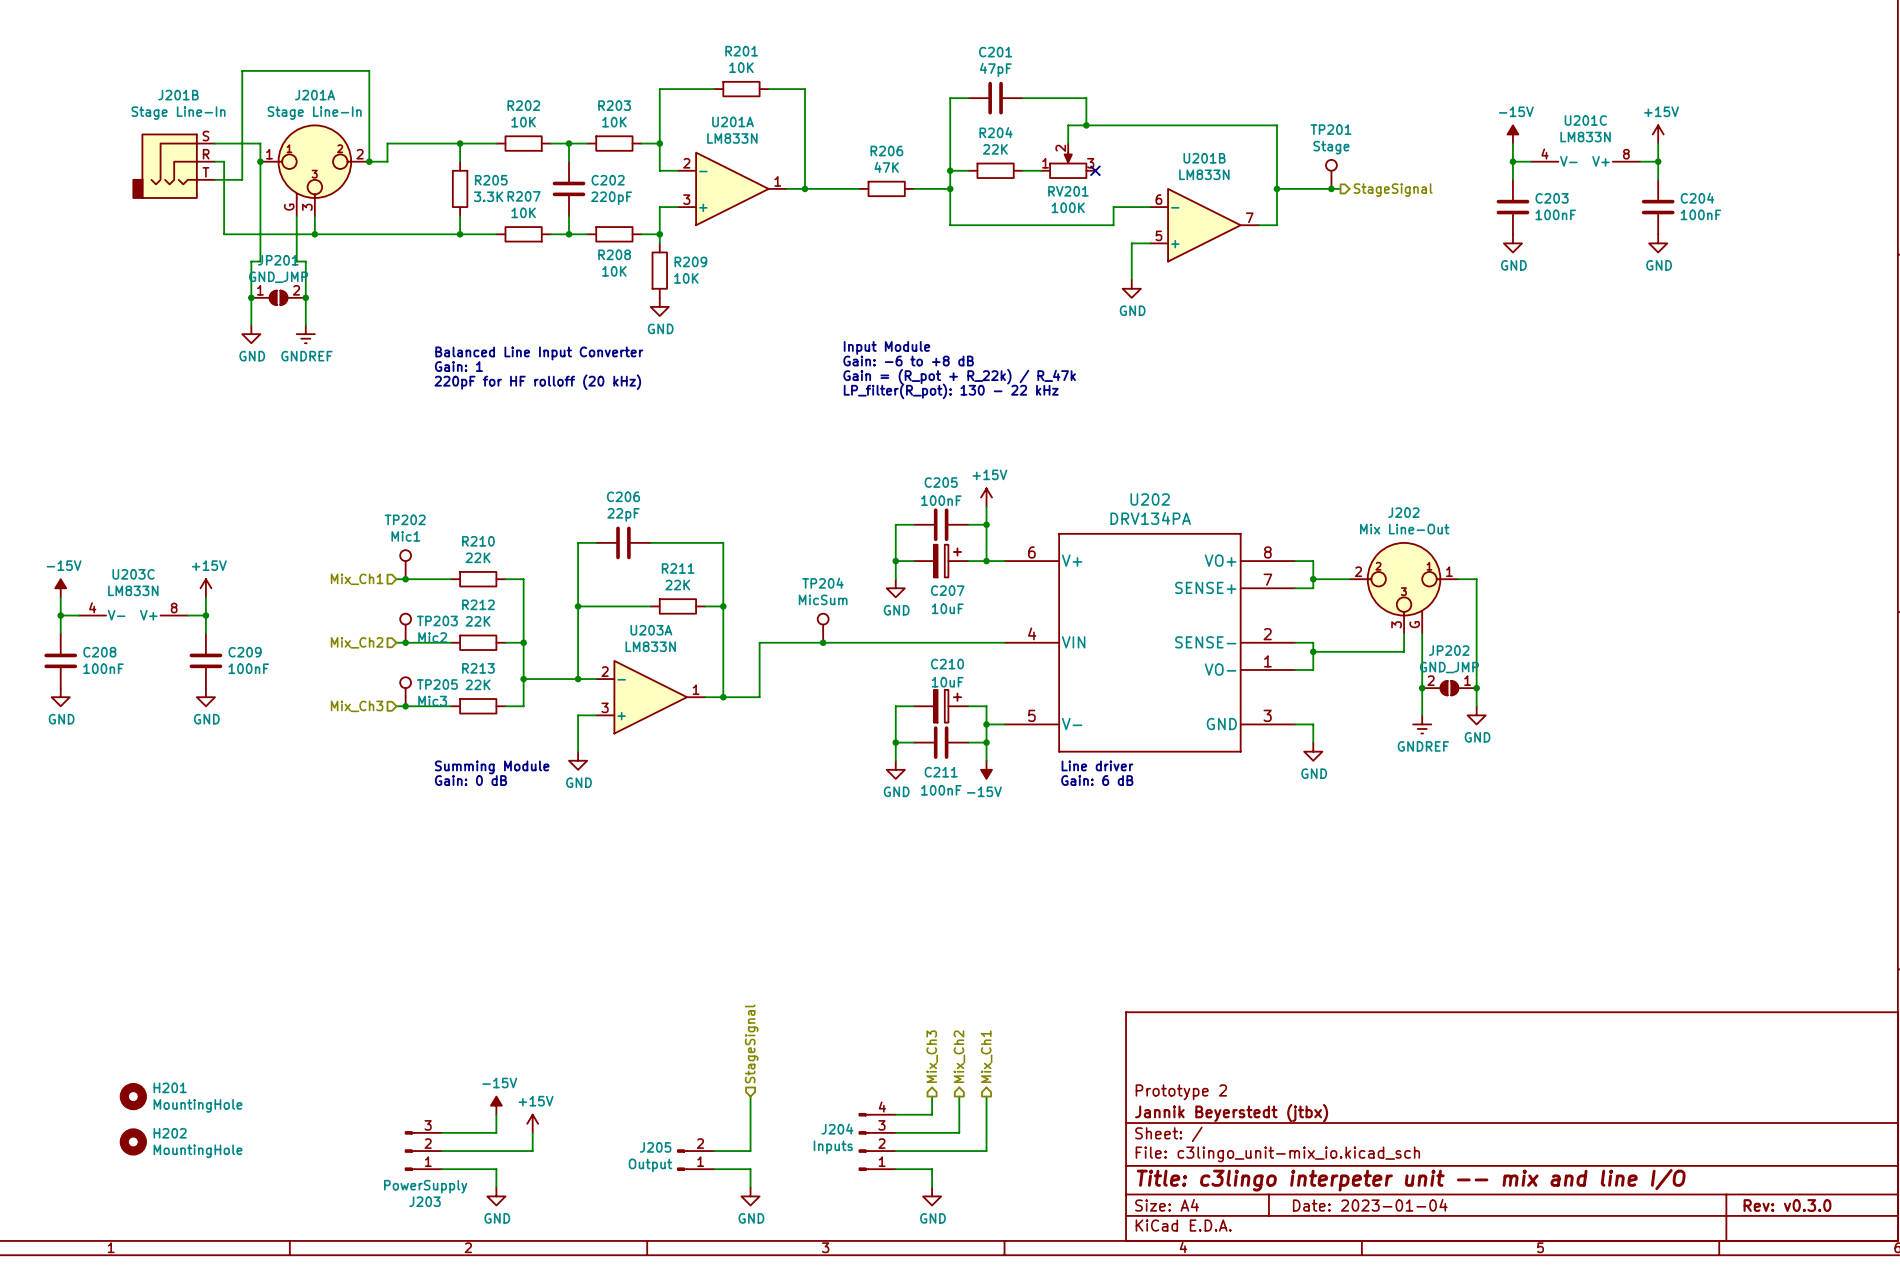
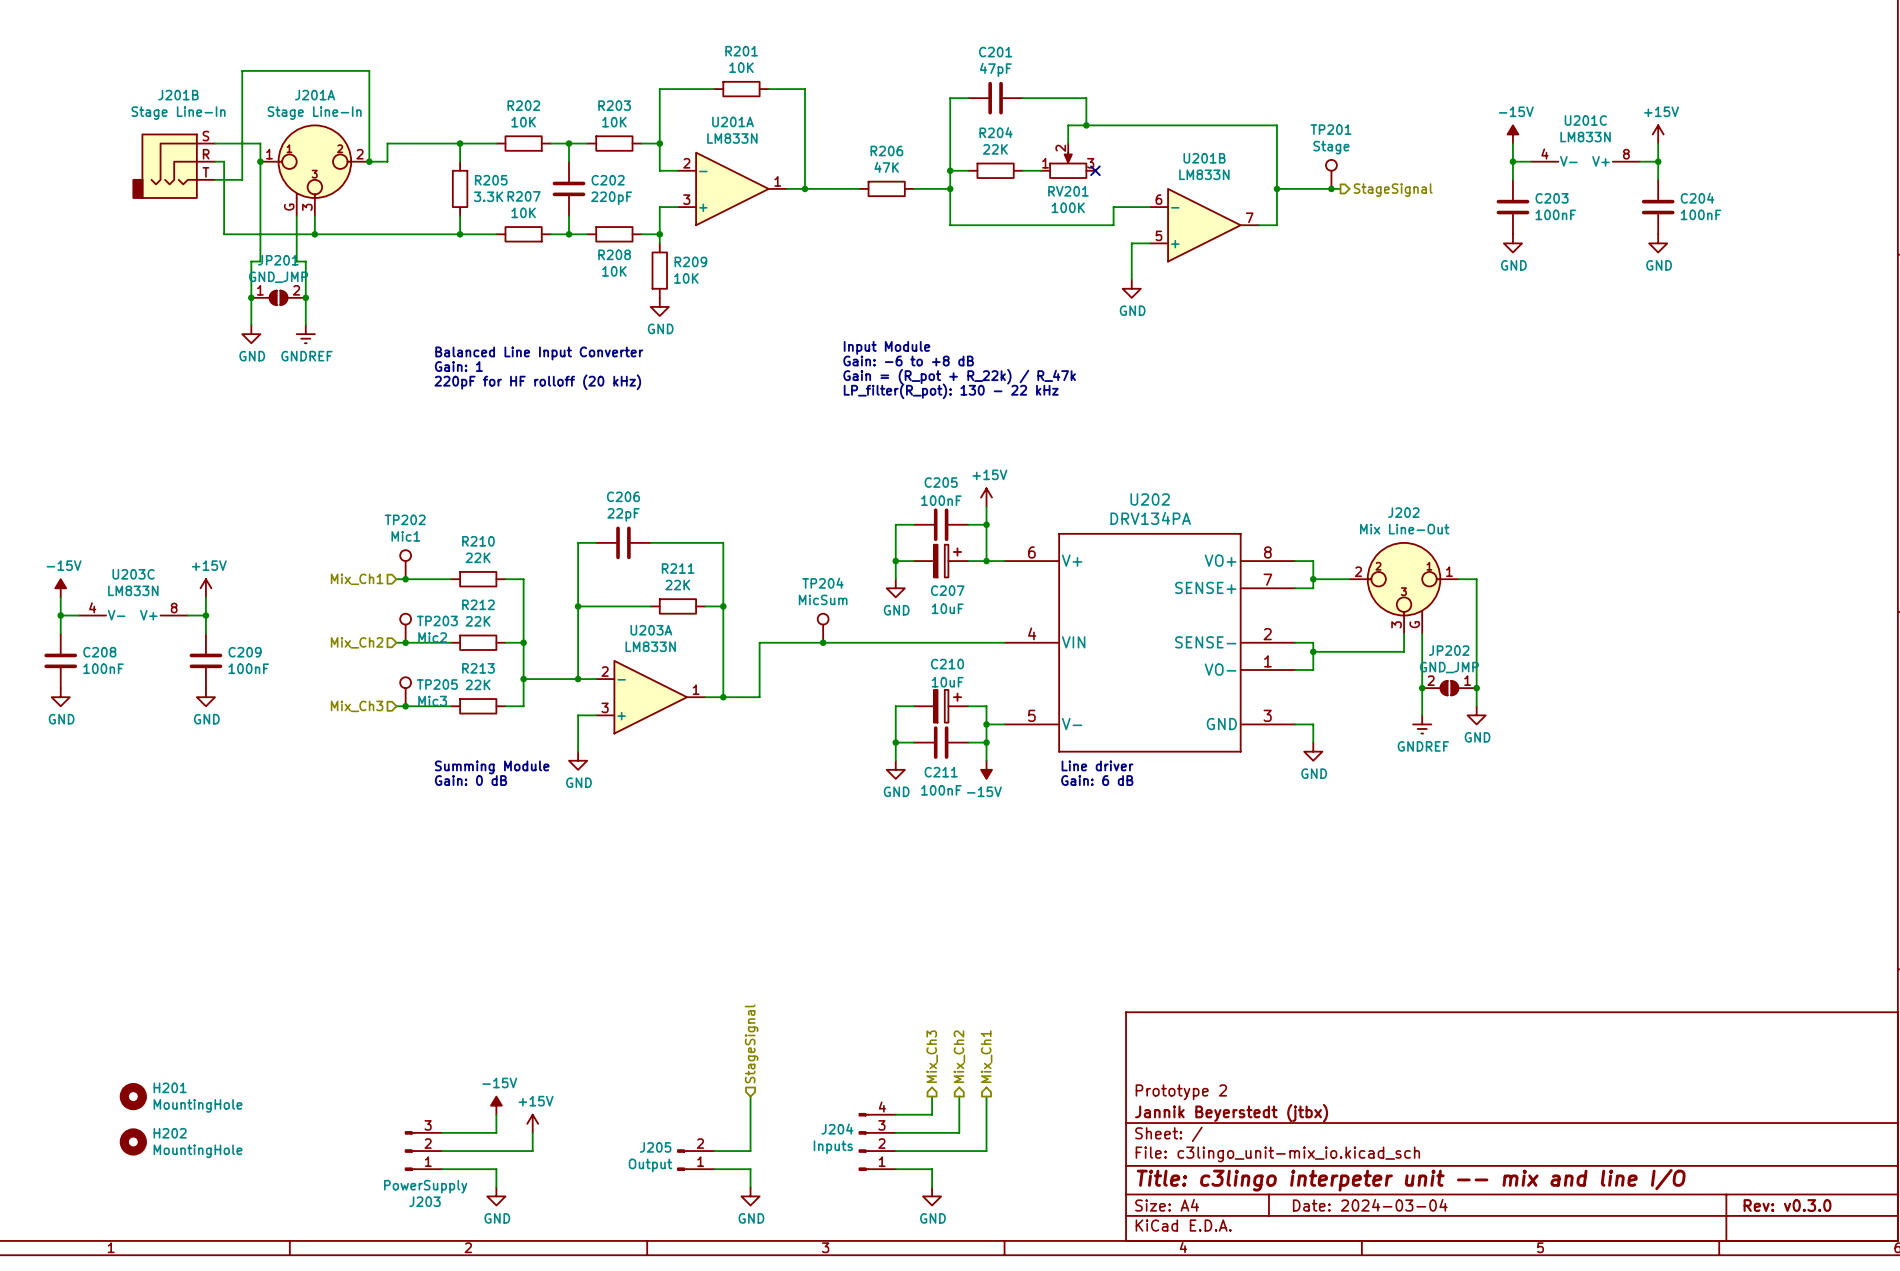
title block: Date: 2023-01-04 (1370, 1205) -> Date: 2024-03-04 (1370, 1205)

